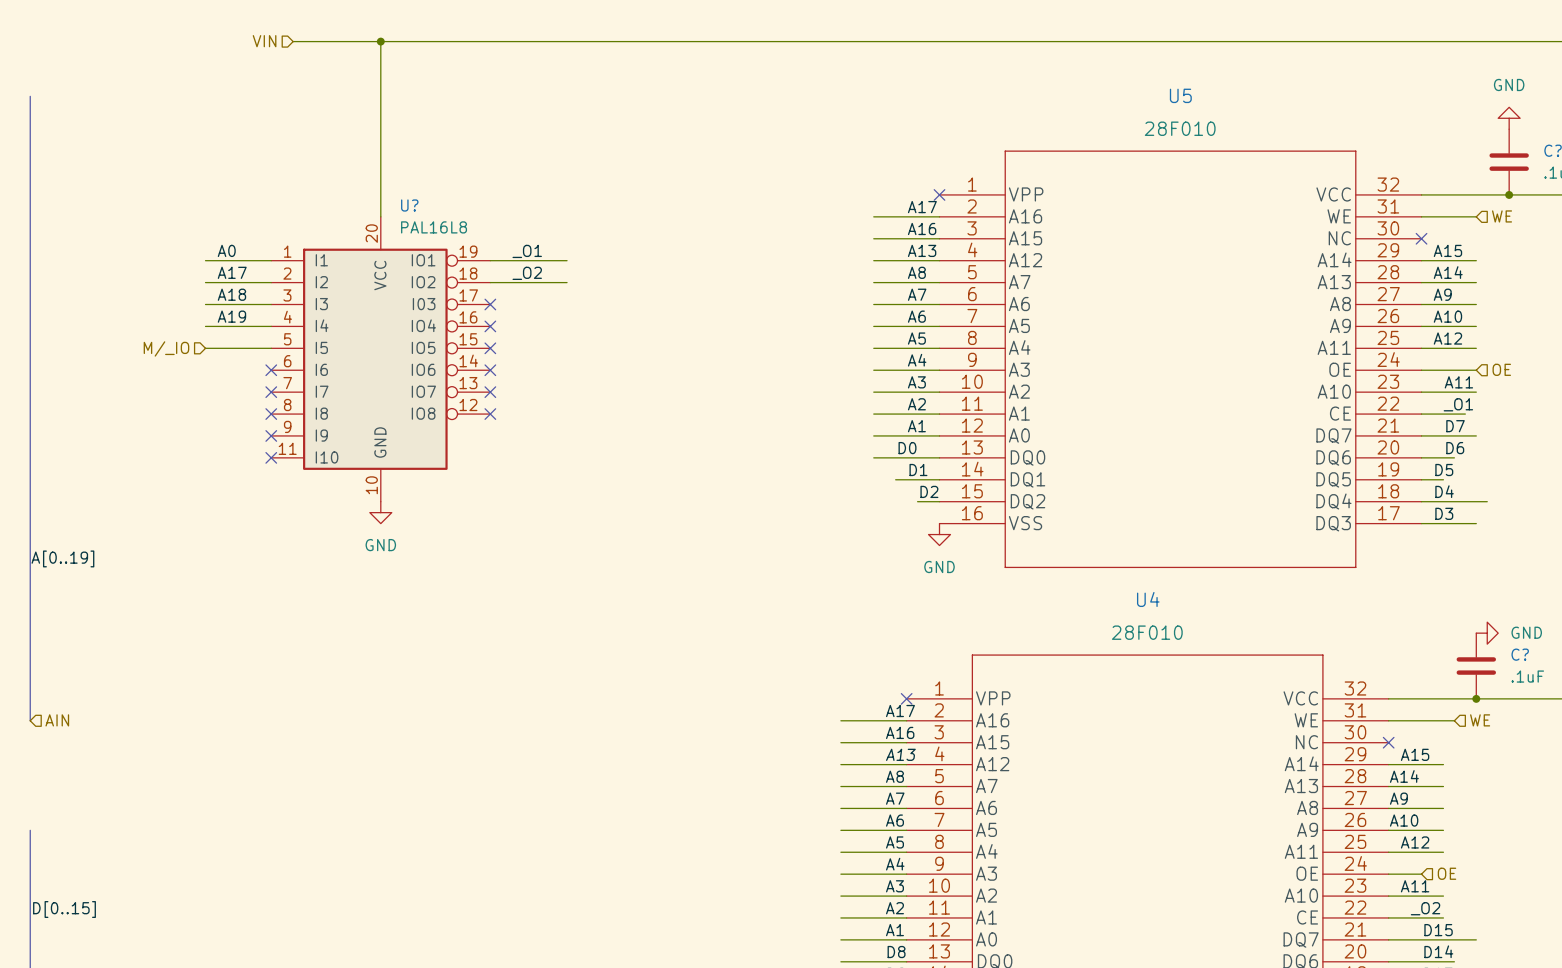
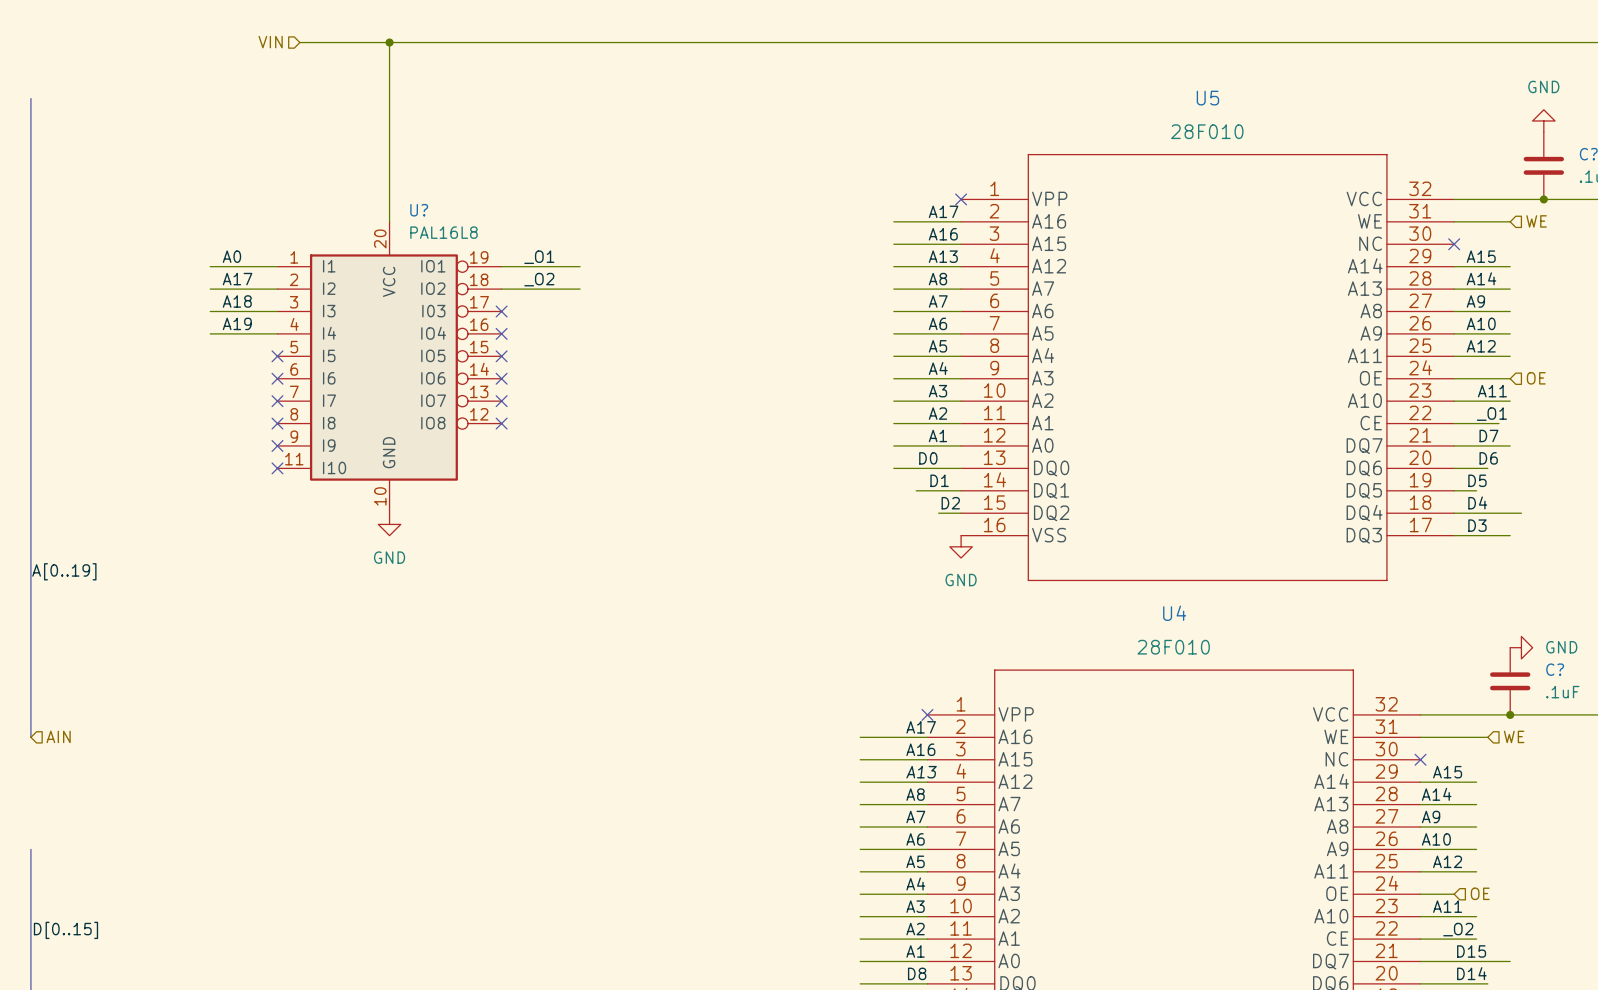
hierarchical label: M/_IO (166, 348) -> none
wire: (205, 348) (271, 348) -> none
no-connect mark: none -> (277, 356)

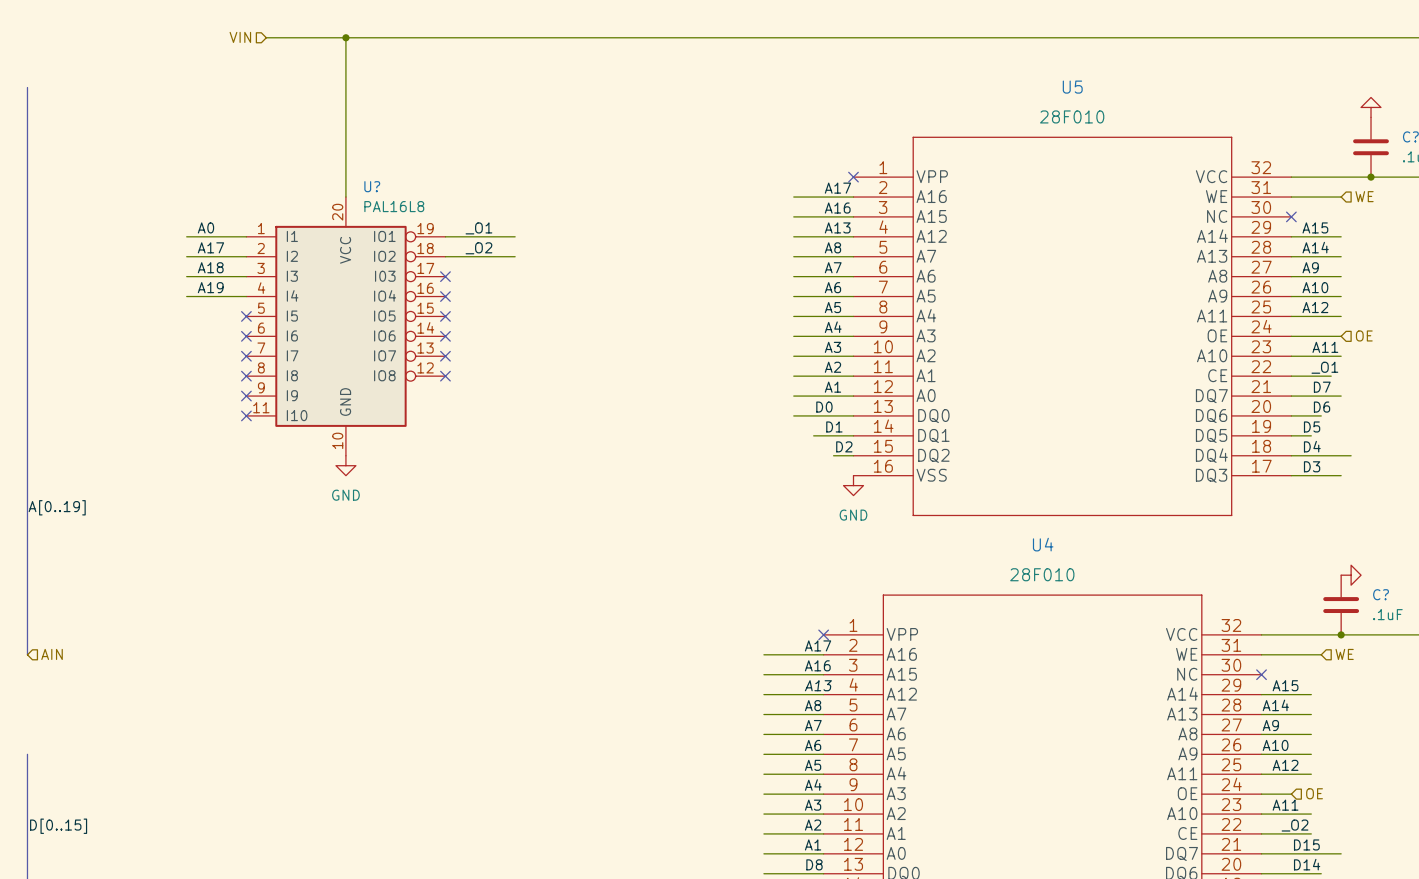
power symbol text: GND (1543, 86) -> none
power symbol text: GND (1561, 647) -> none

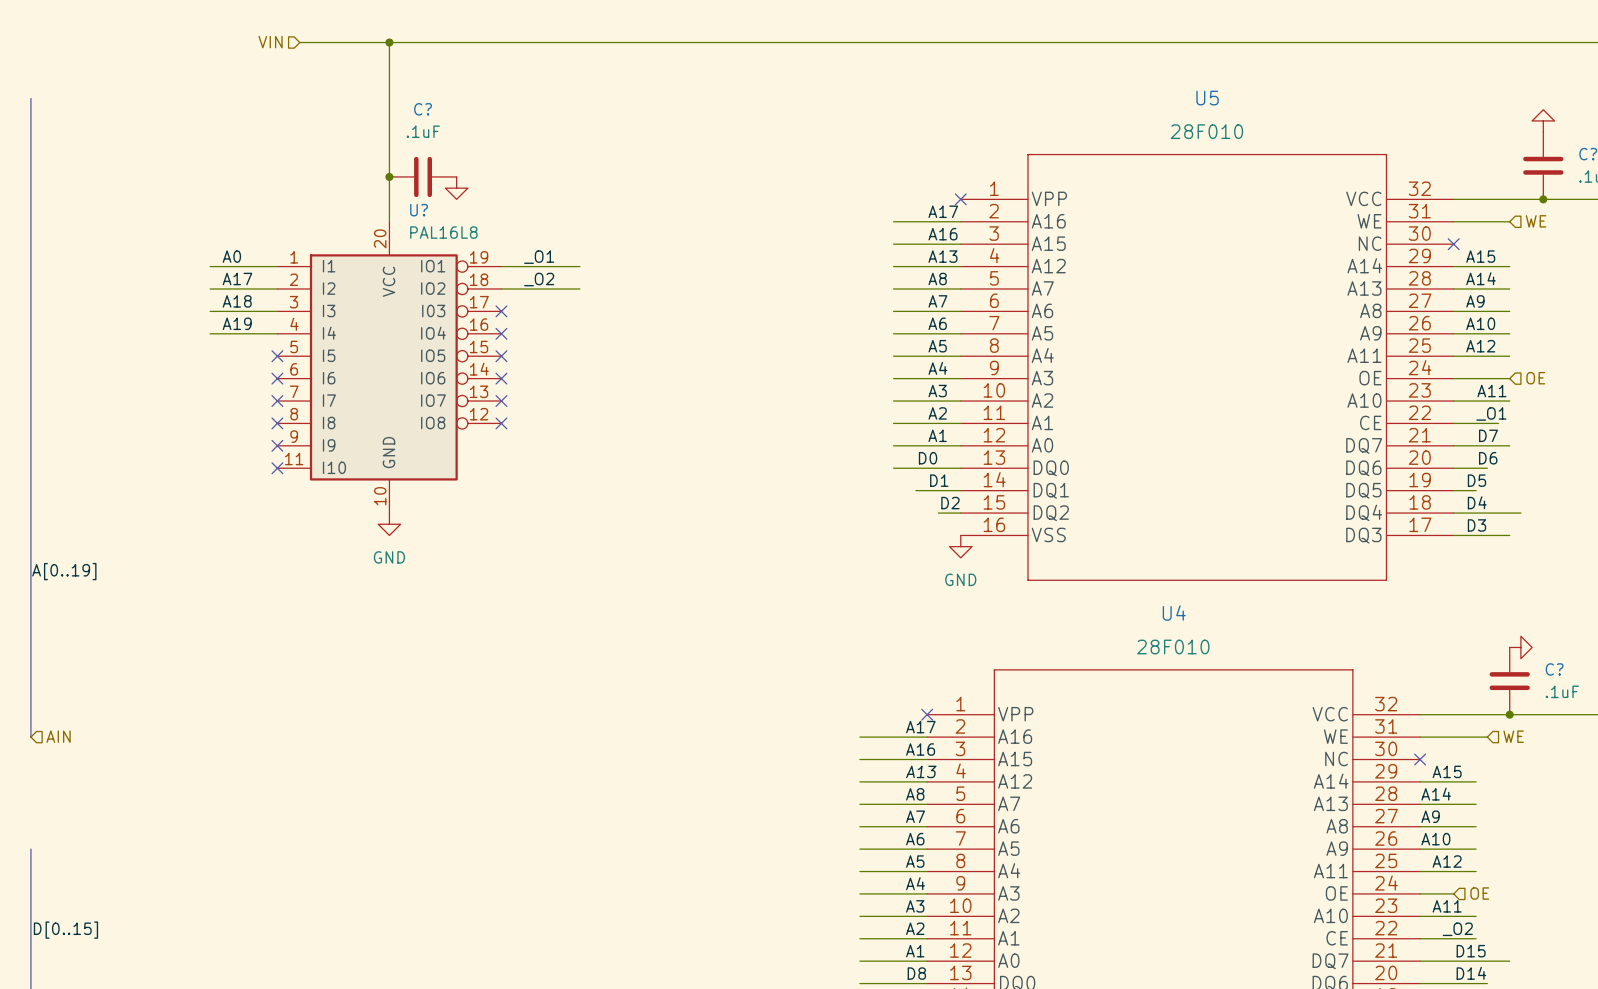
junction: none -> (389, 176)
C?: none -> .1uF (423, 176)
power symbol: none -> (456, 188)

